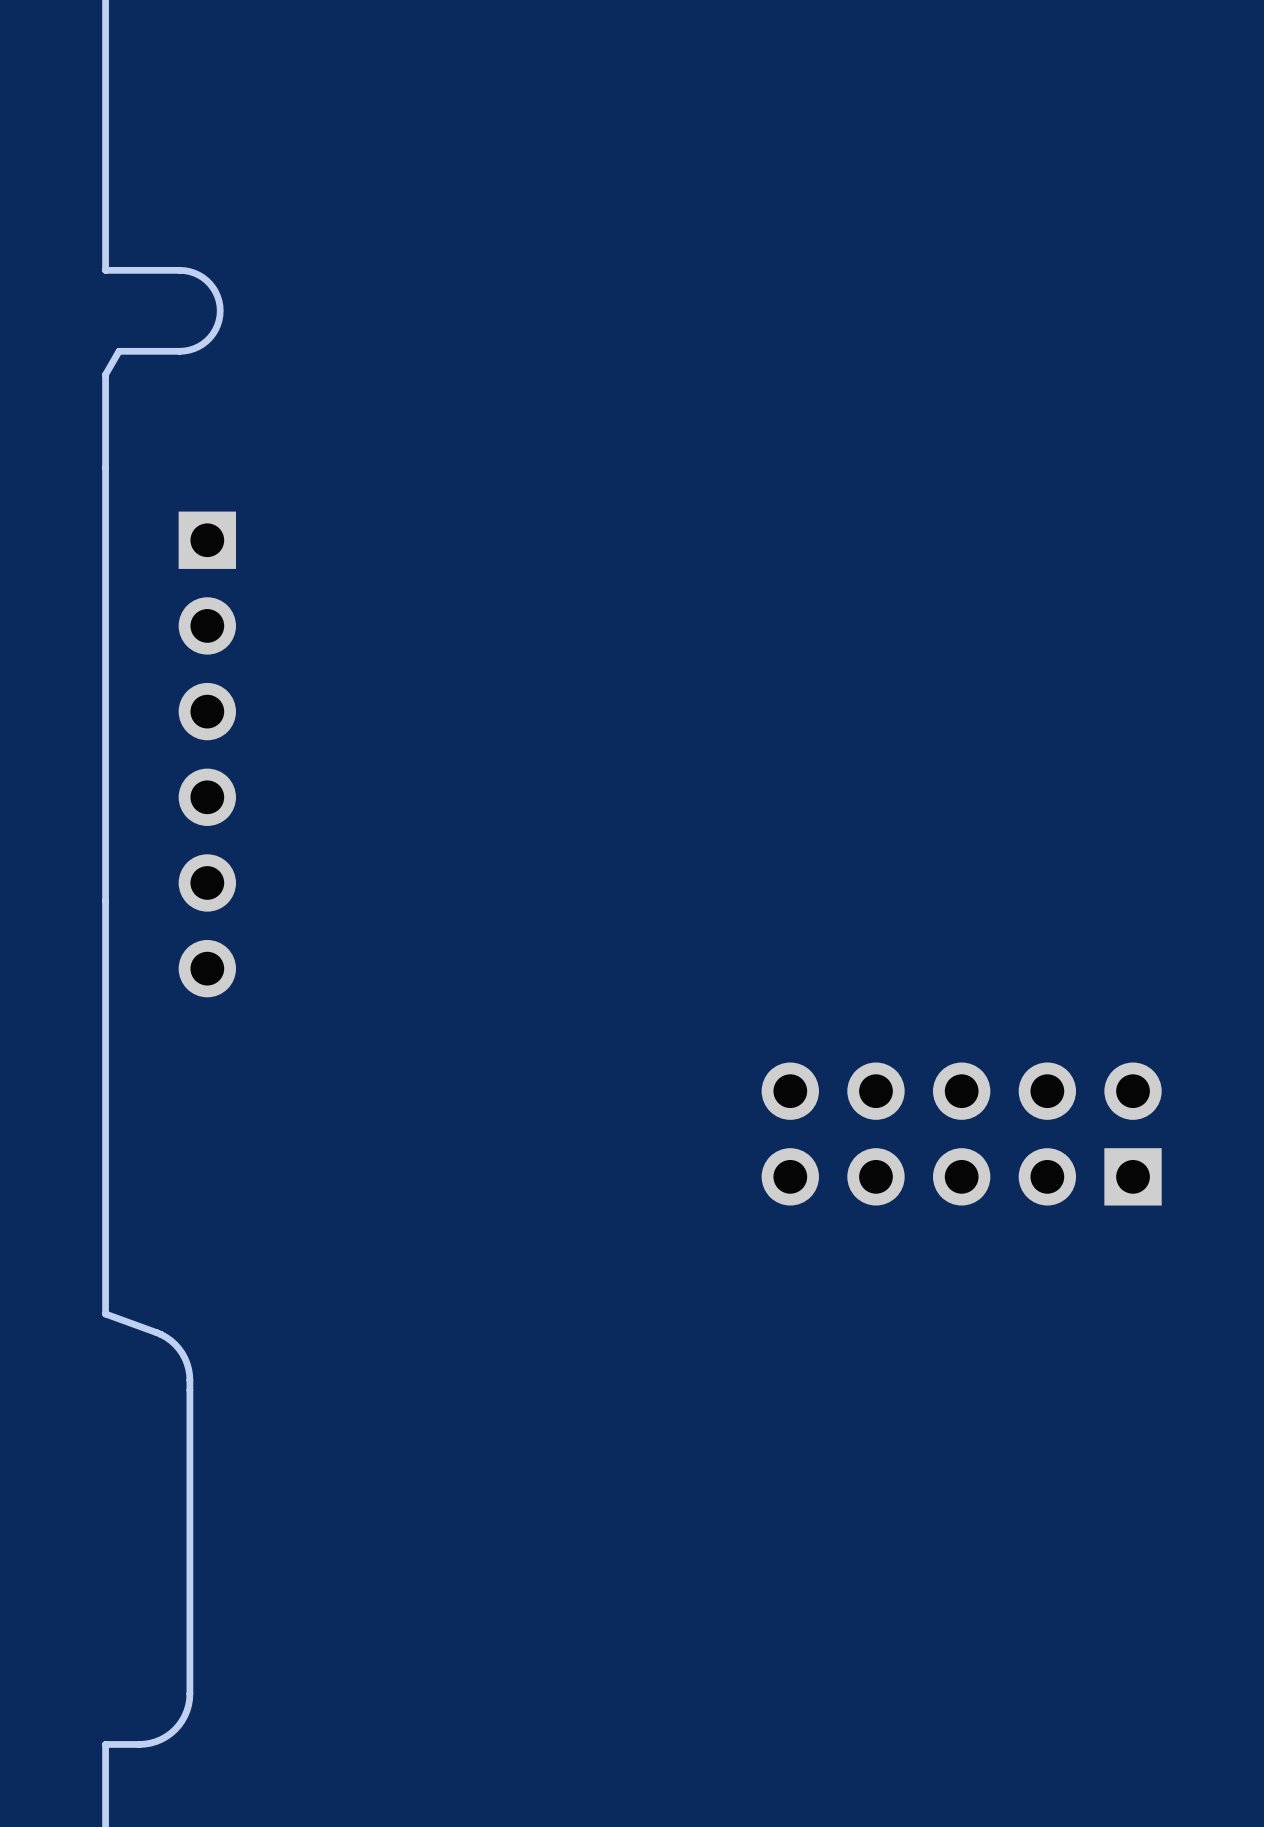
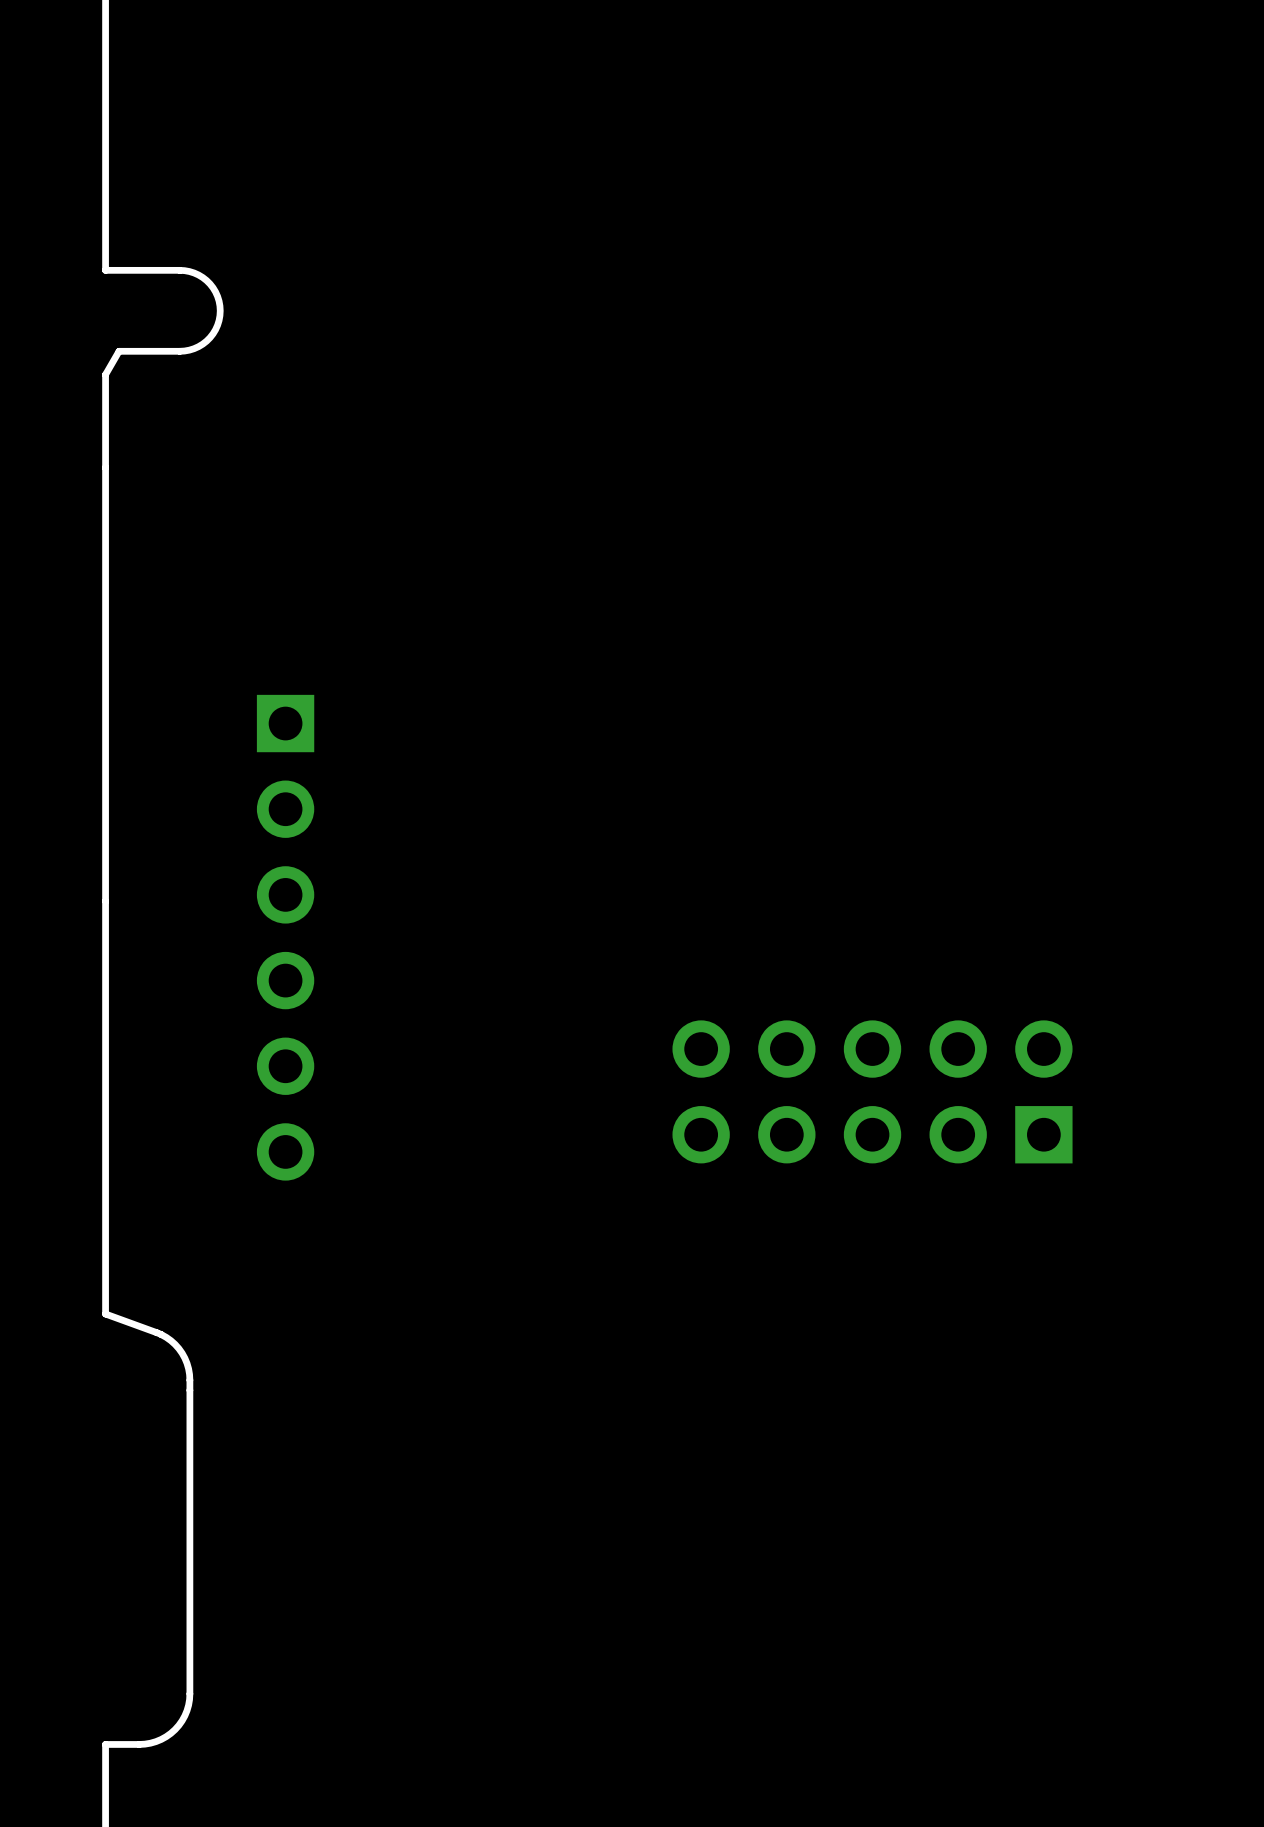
part position: (207, 754) -> (285, 937)
part position: (961, 1134) -> (872, 1091)

